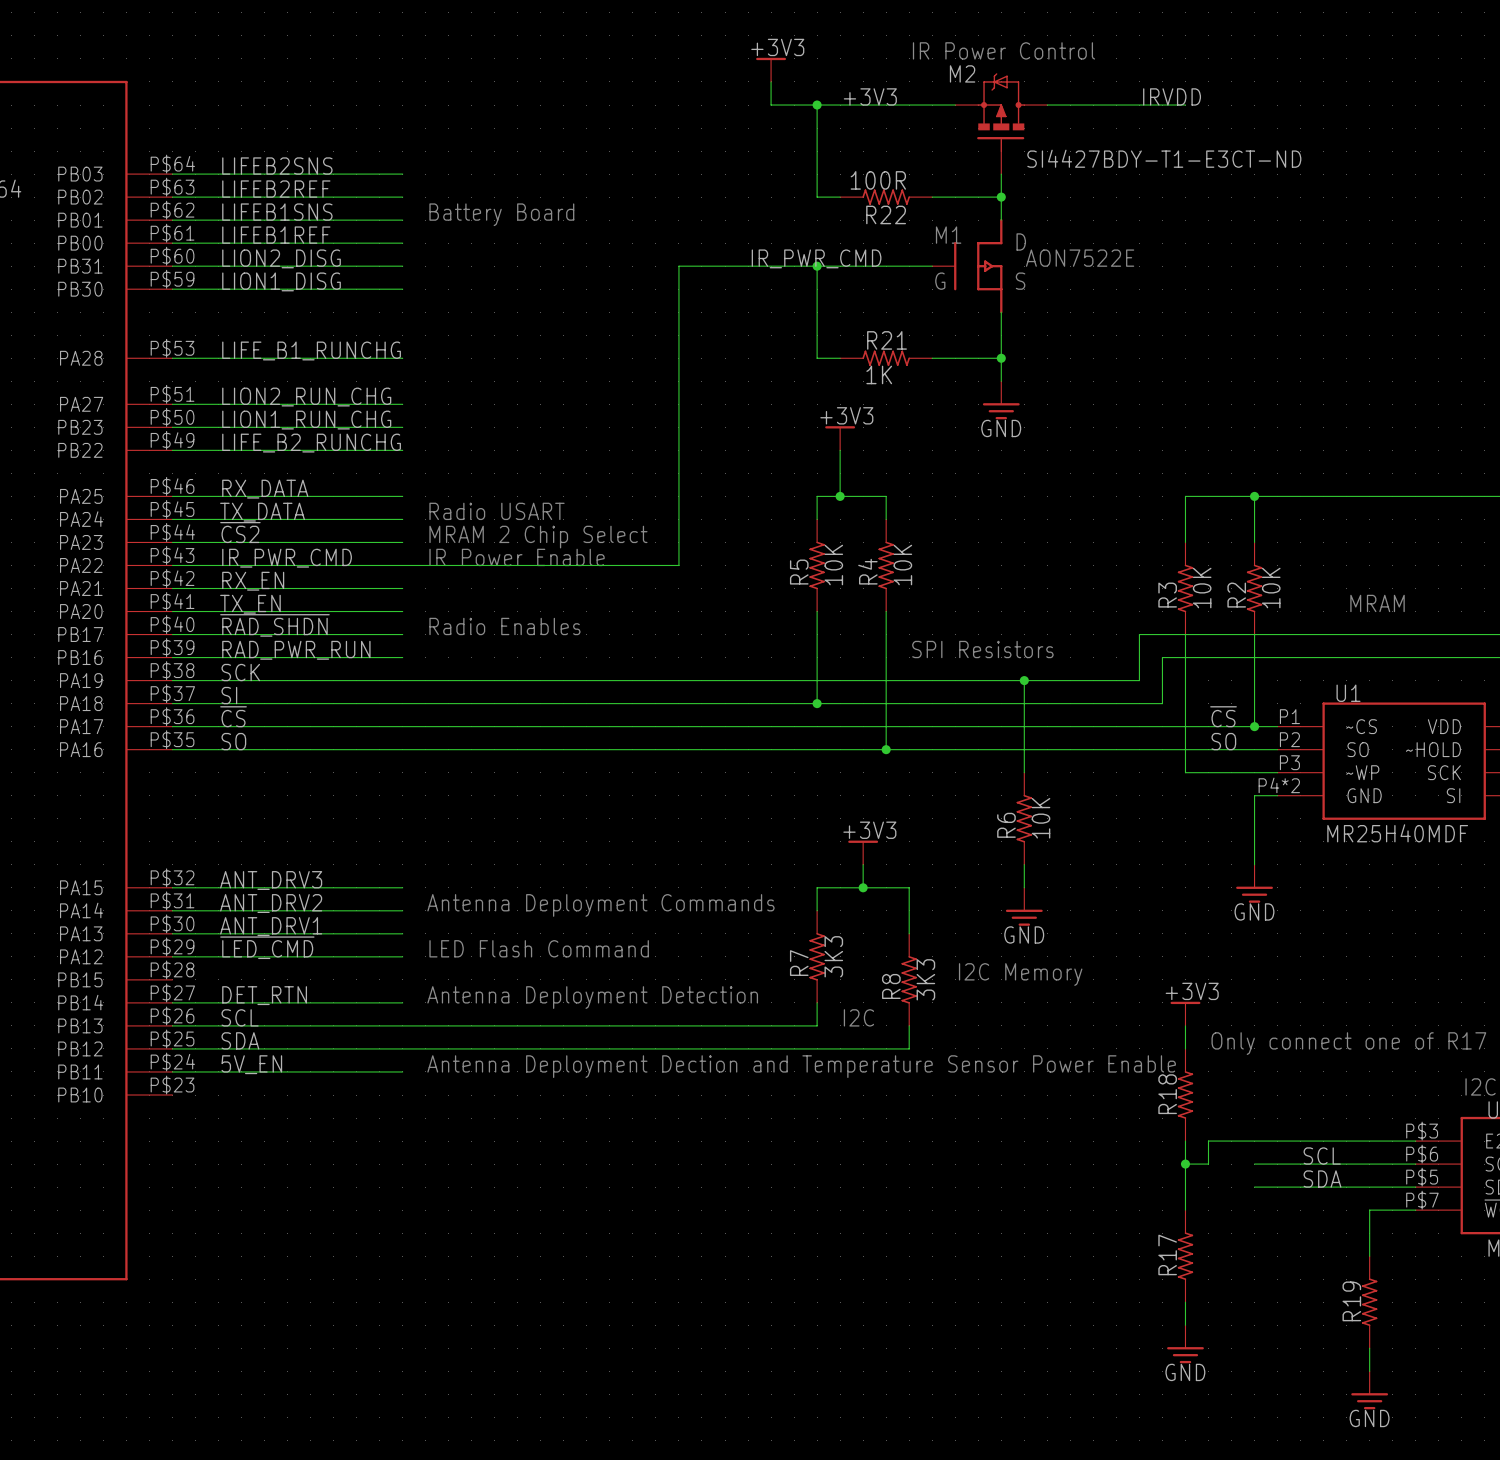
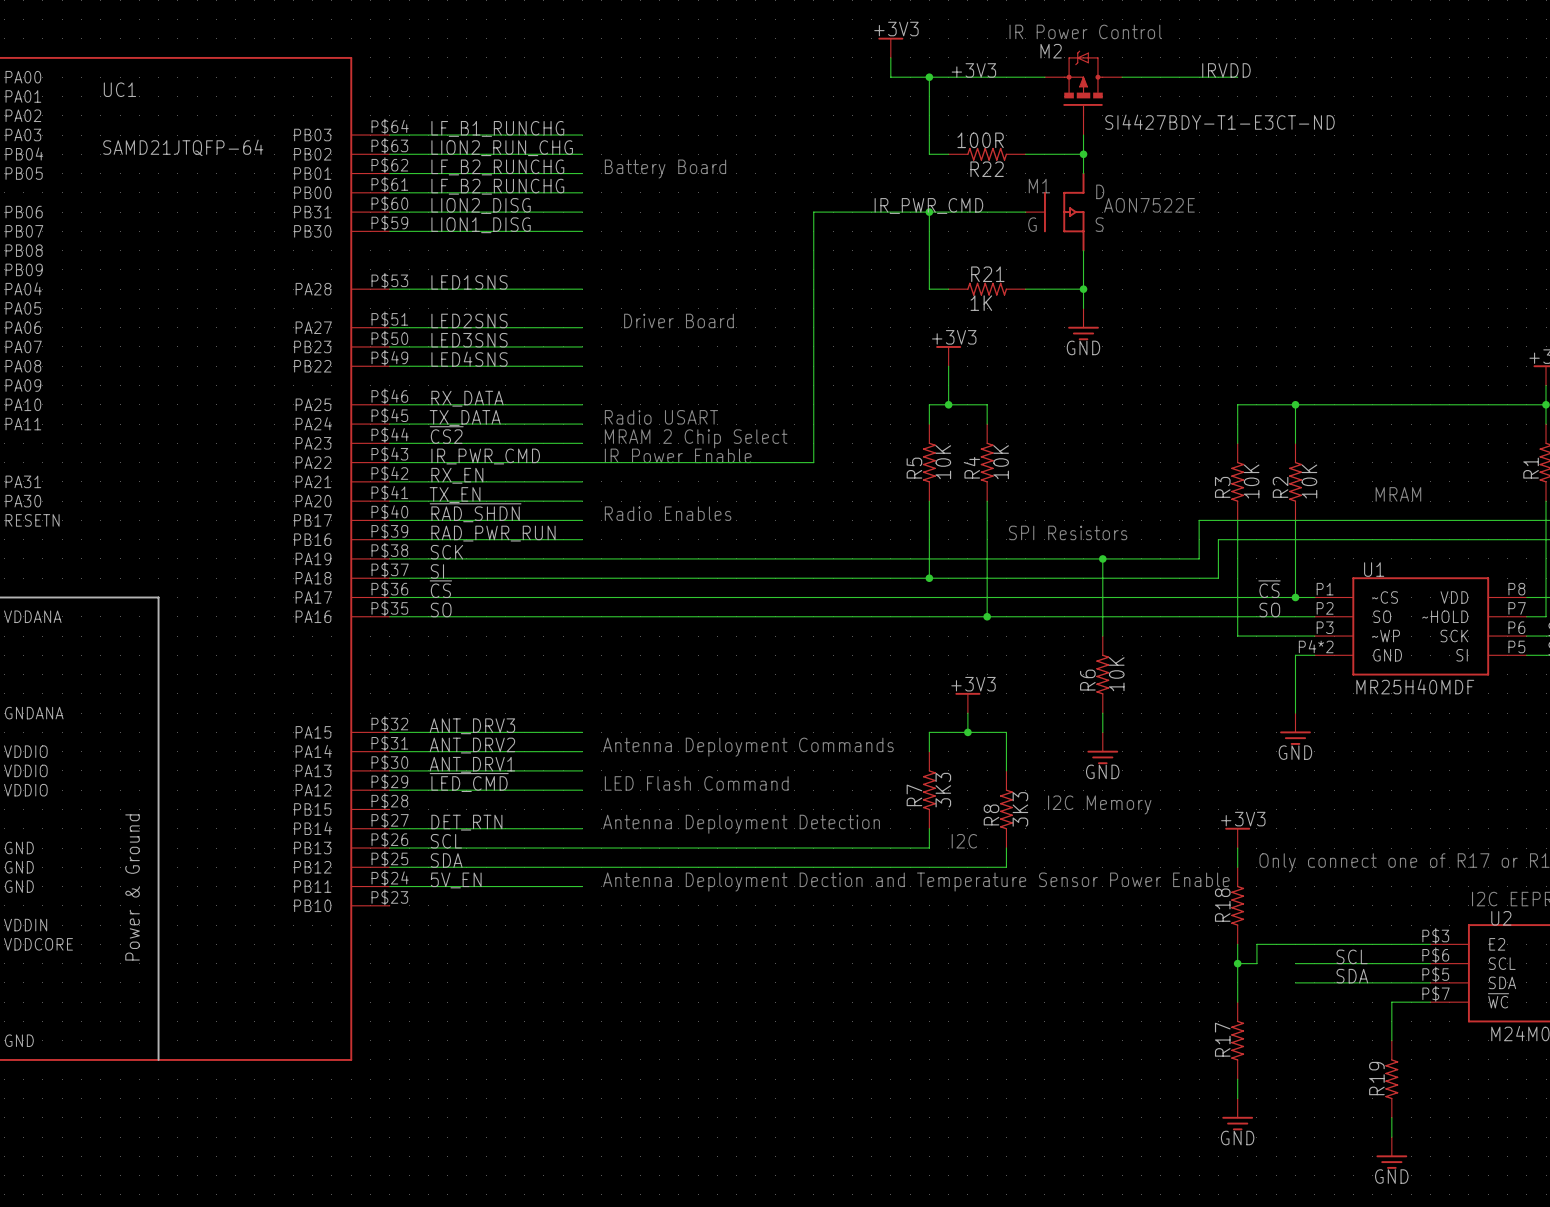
label: LIFEB2SNS (277, 166) -> LF_B1_RUNCHG (497, 128)
label: LIFEB2REF (276, 189) -> LION2_RUN_CHG (502, 148)
label: LIFEB1SNS (277, 212) -> LF_B2_RUNCHG (497, 167)
label: LIFEB1REF (276, 235) -> LF_B2_RUNCHG (497, 186)
label: LIFE_B1_RUNCHG (311, 350) -> LED1SNS (469, 282)
text: none -> Driver Board (678, 320)
label: LION2_RUN_CHG (306, 397) -> LED2SNS (469, 320)
label: LION1_RUN_CHG (306, 420) -> LED3SNS (469, 340)
label: LIFE_B2_RUNCHG (311, 443) -> LED4SNS (469, 359)

